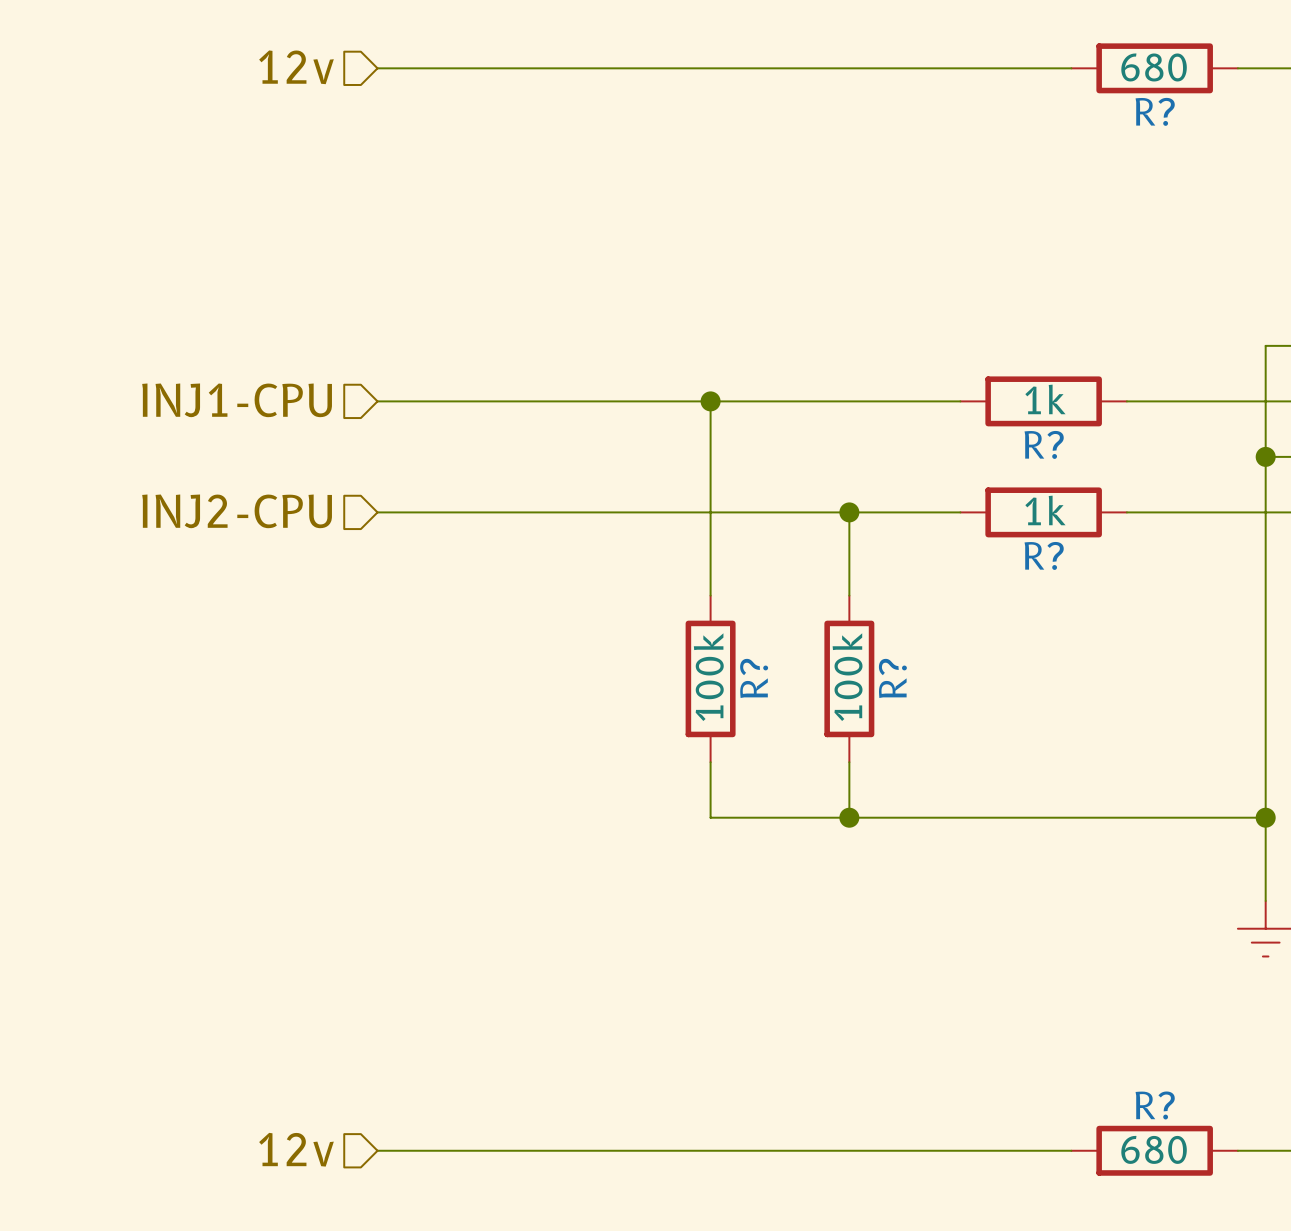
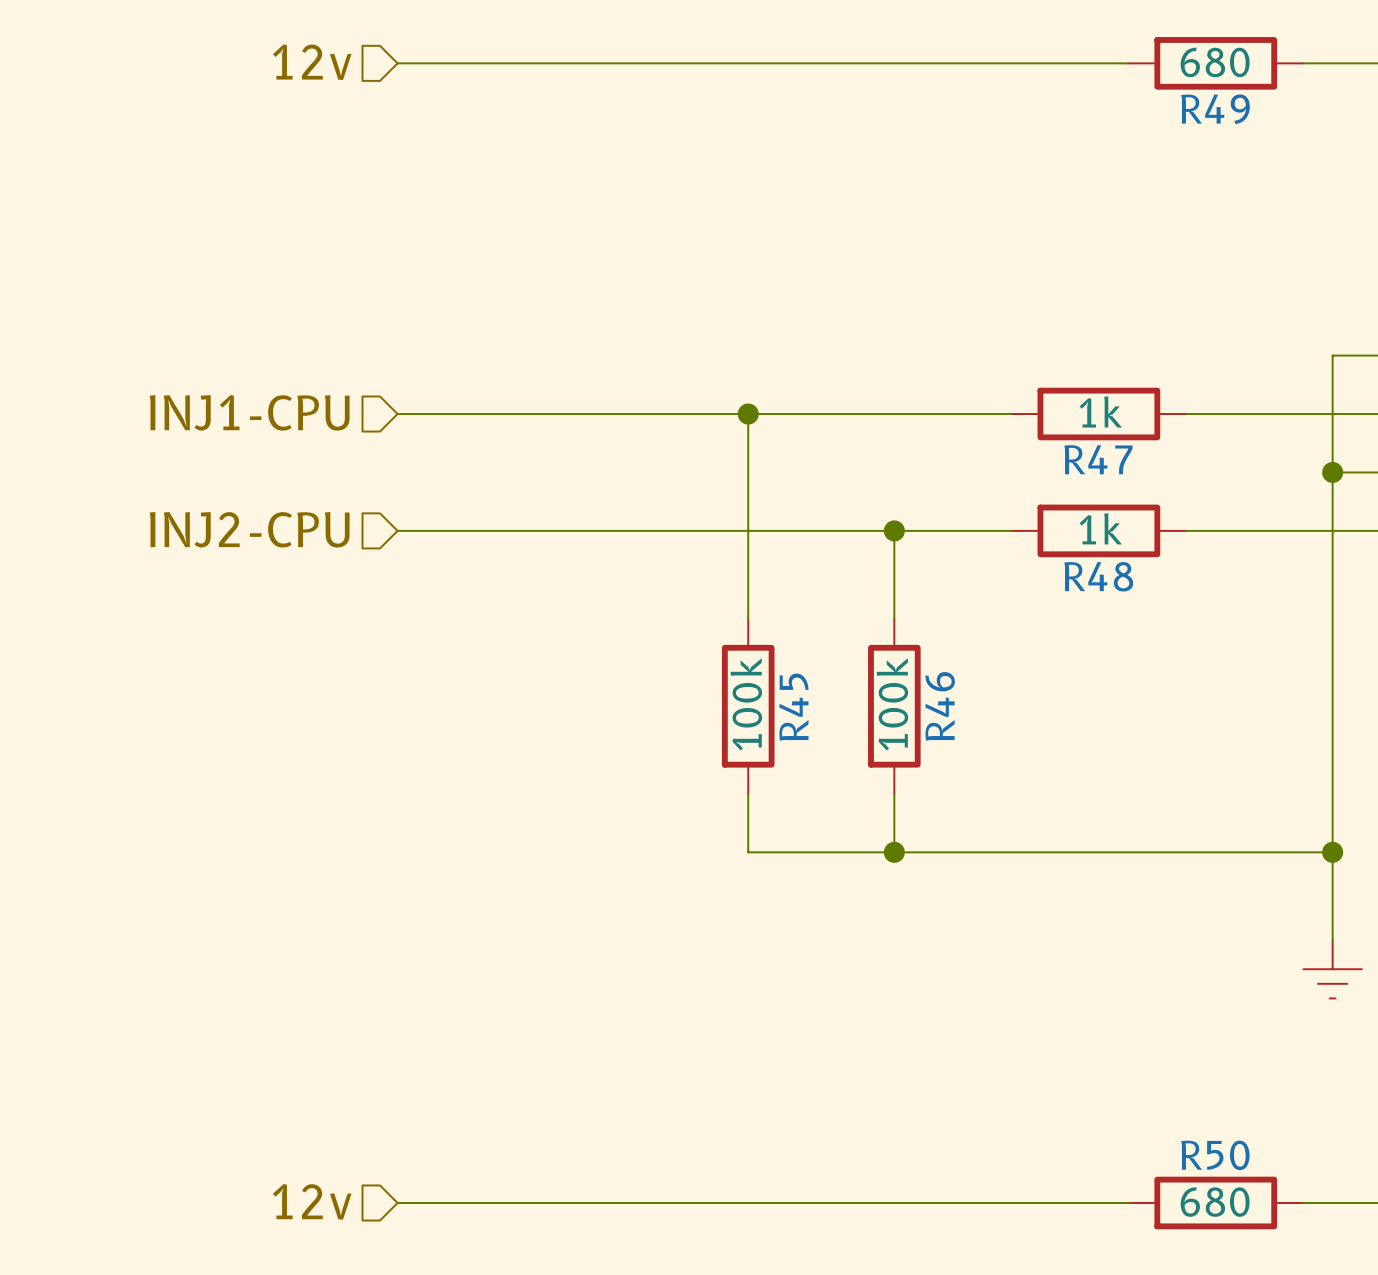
R? name: R? (1155, 111) -> R49 (1215, 109)
R? name: R? (1044, 444) -> R47 (1098, 459)
R? name: R? (1044, 555) -> R48 (1098, 576)
R? name: R? (754, 678) -> R45 (793, 707)
R? name: R? (892, 678) -> R46 (940, 706)
R? name: R? (1155, 1105) -> R50 (1215, 1155)

